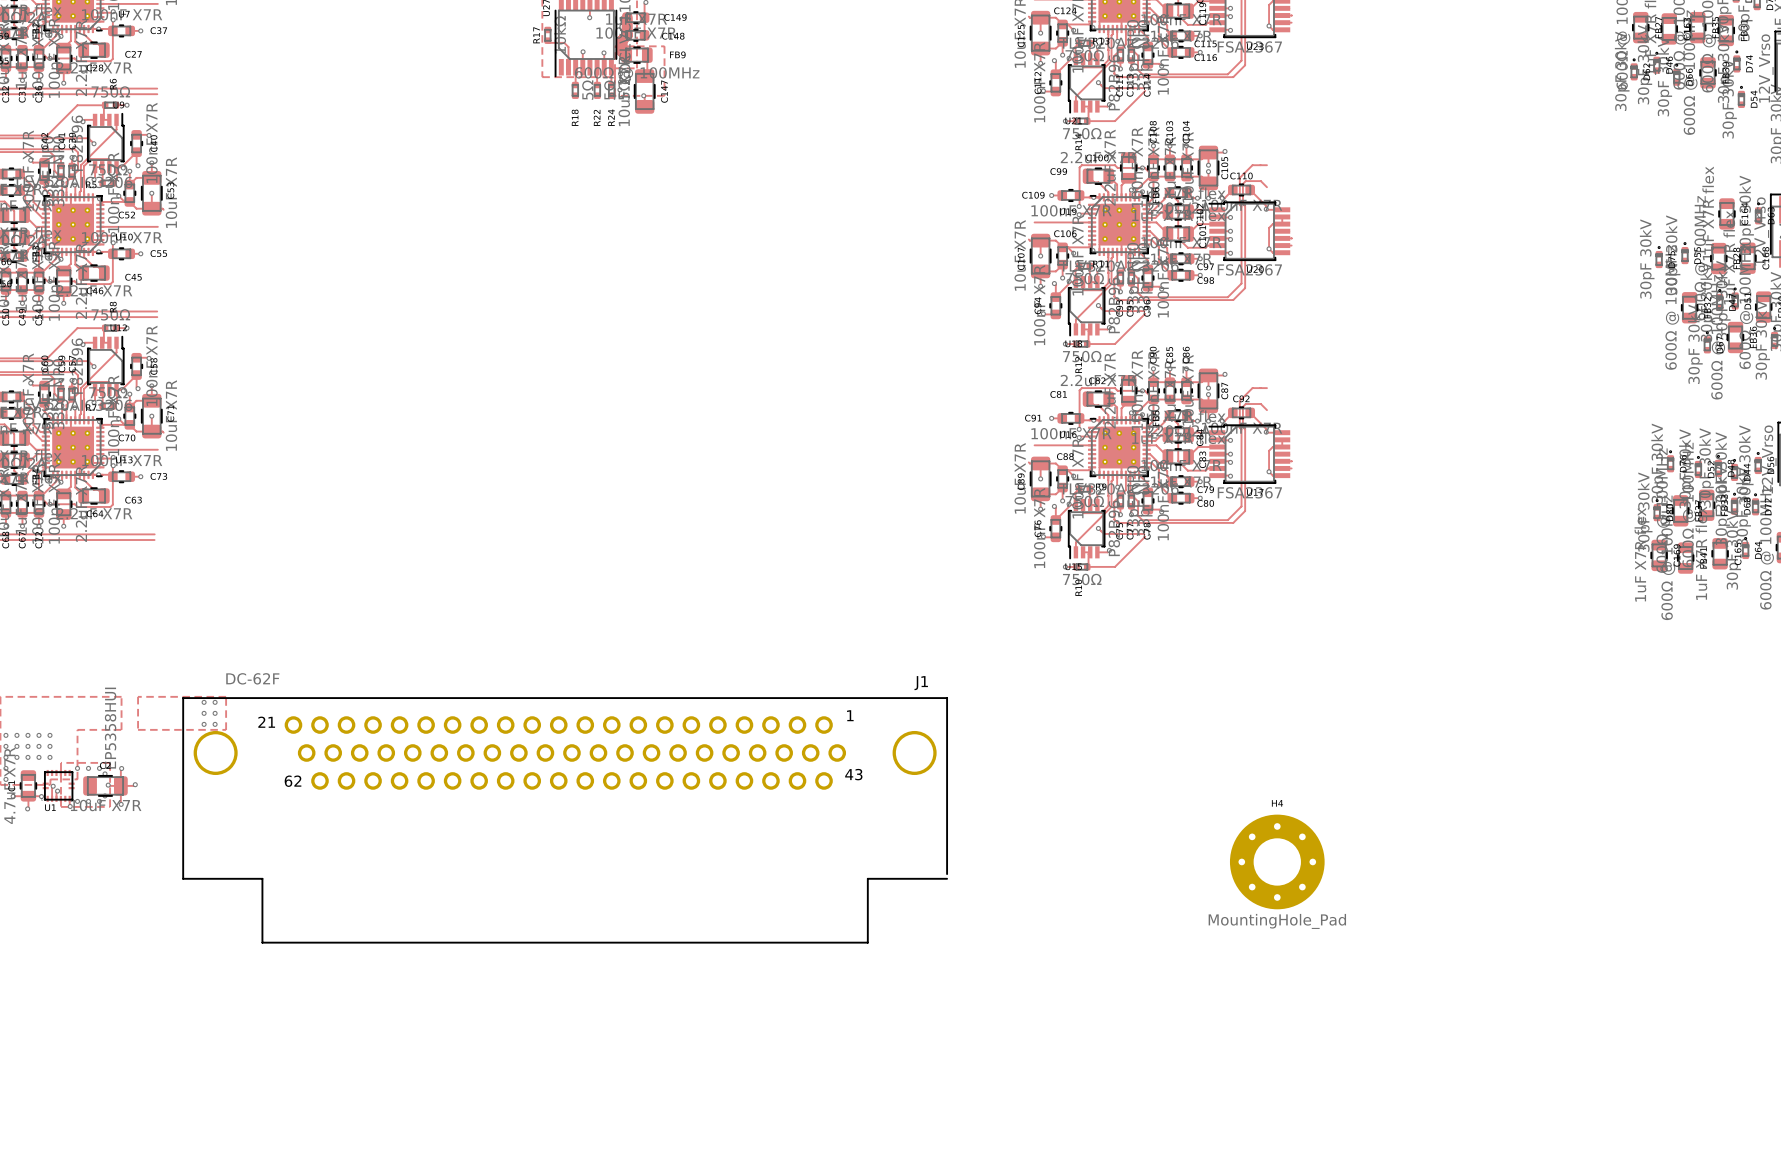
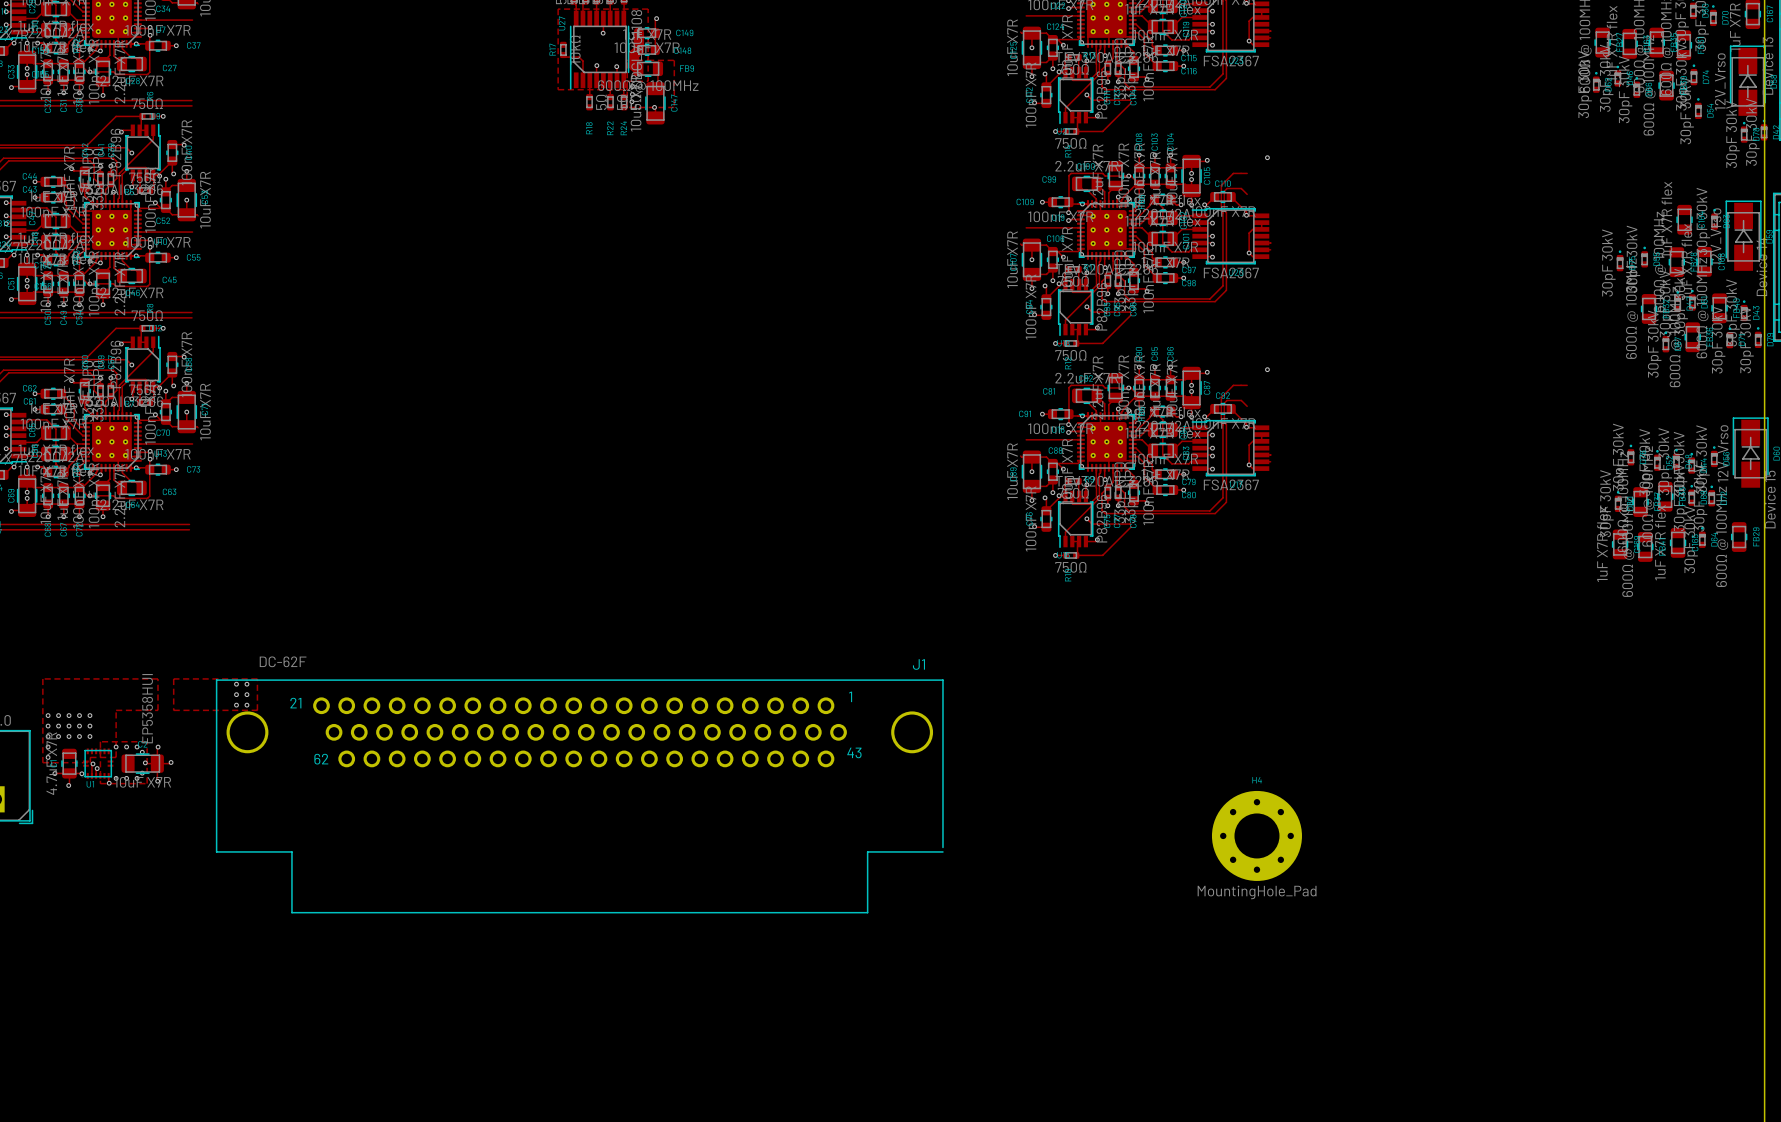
via: none -> (1267, 157)
via: none -> (1267, 369)

